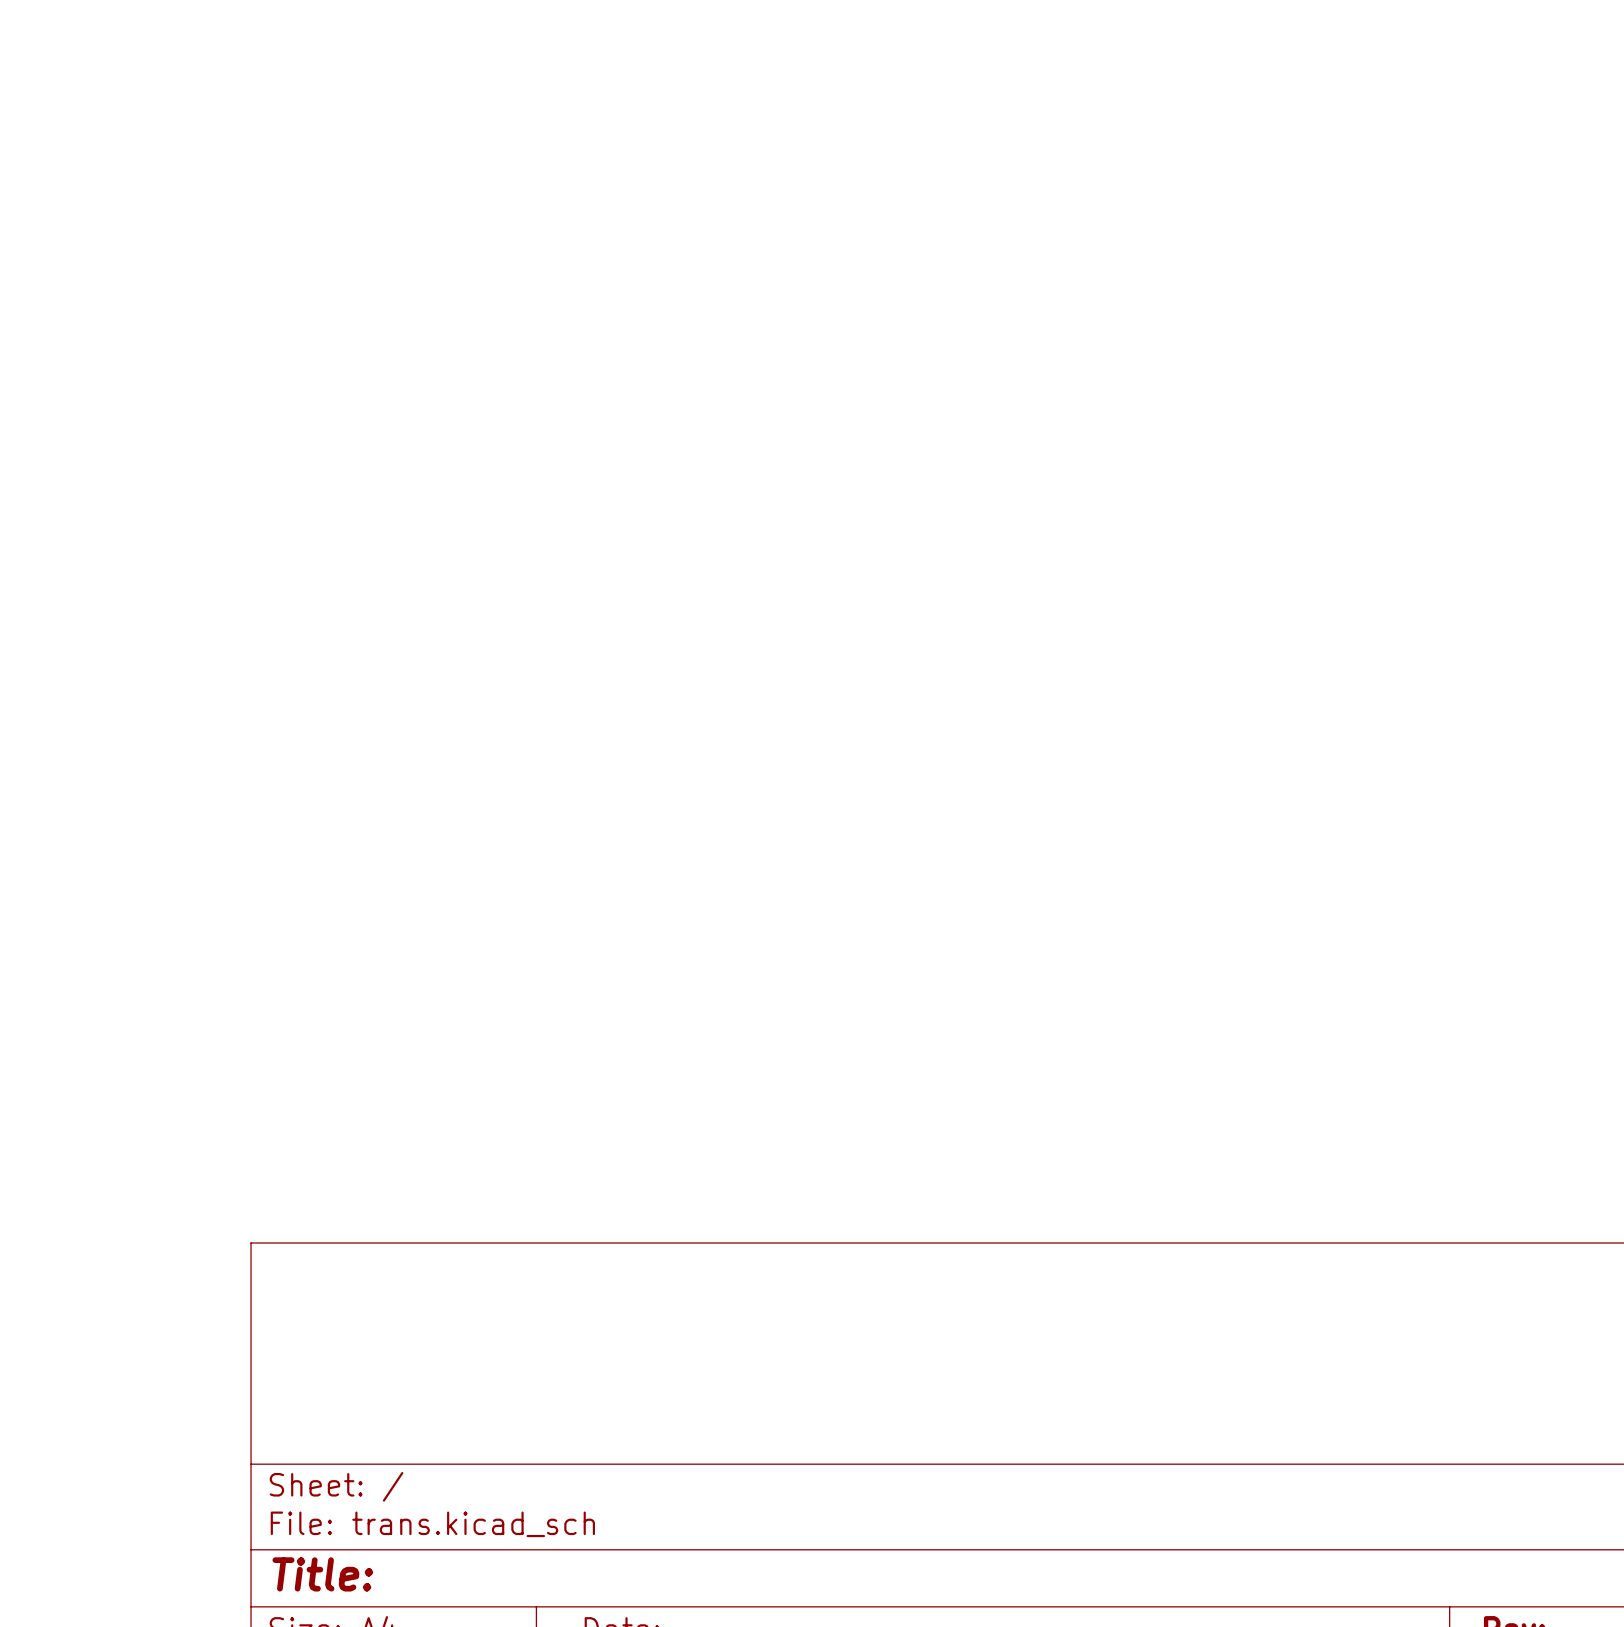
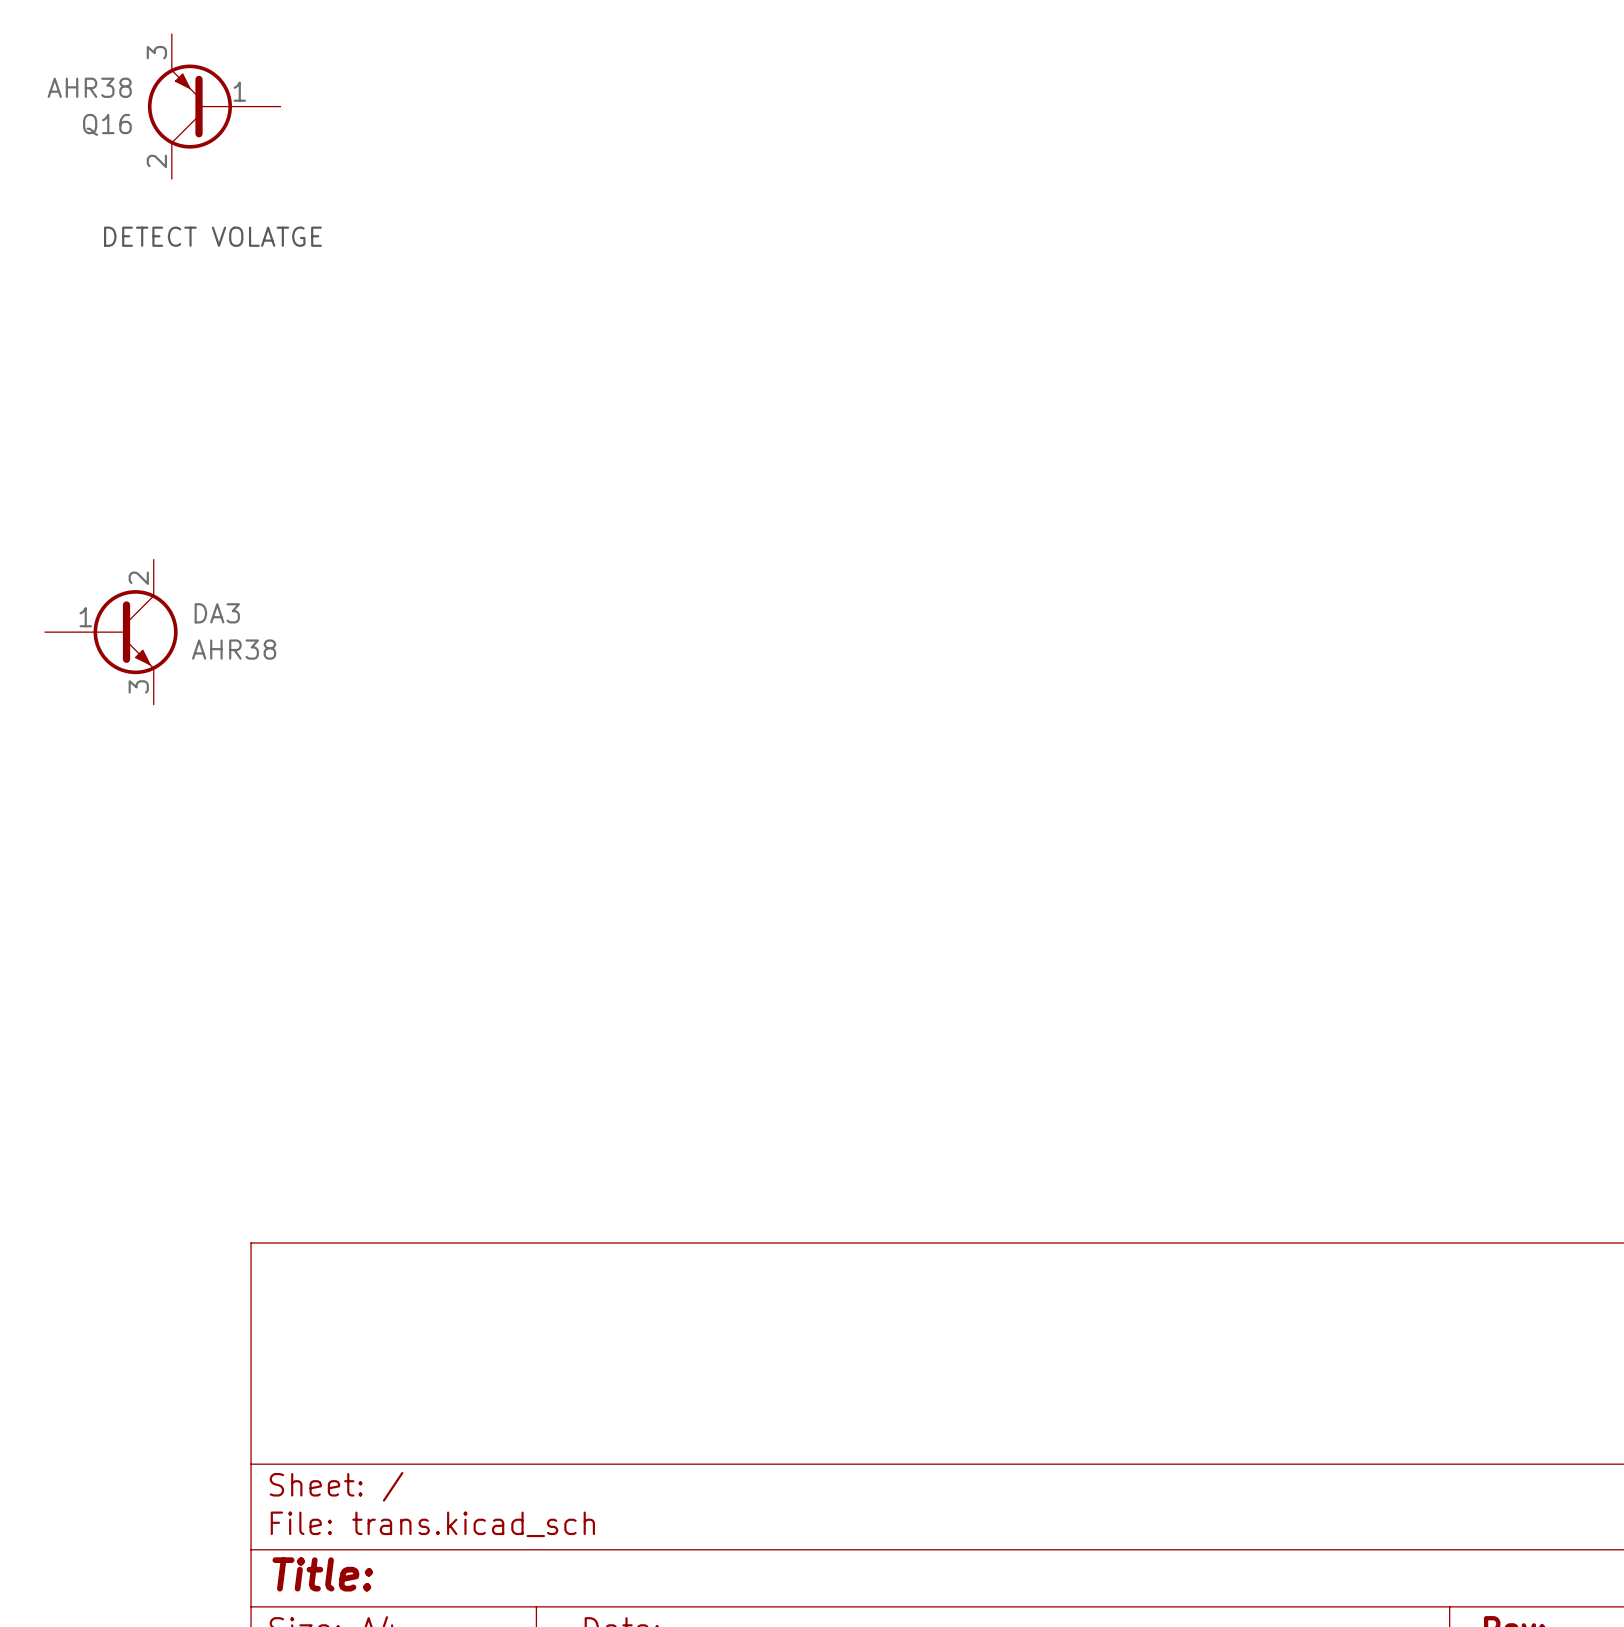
Q16: none -> AHR38 (214, 106)
text: none -> DETECT VOLATGE (212, 236)
DA3: none -> AHR38 (111, 632)

